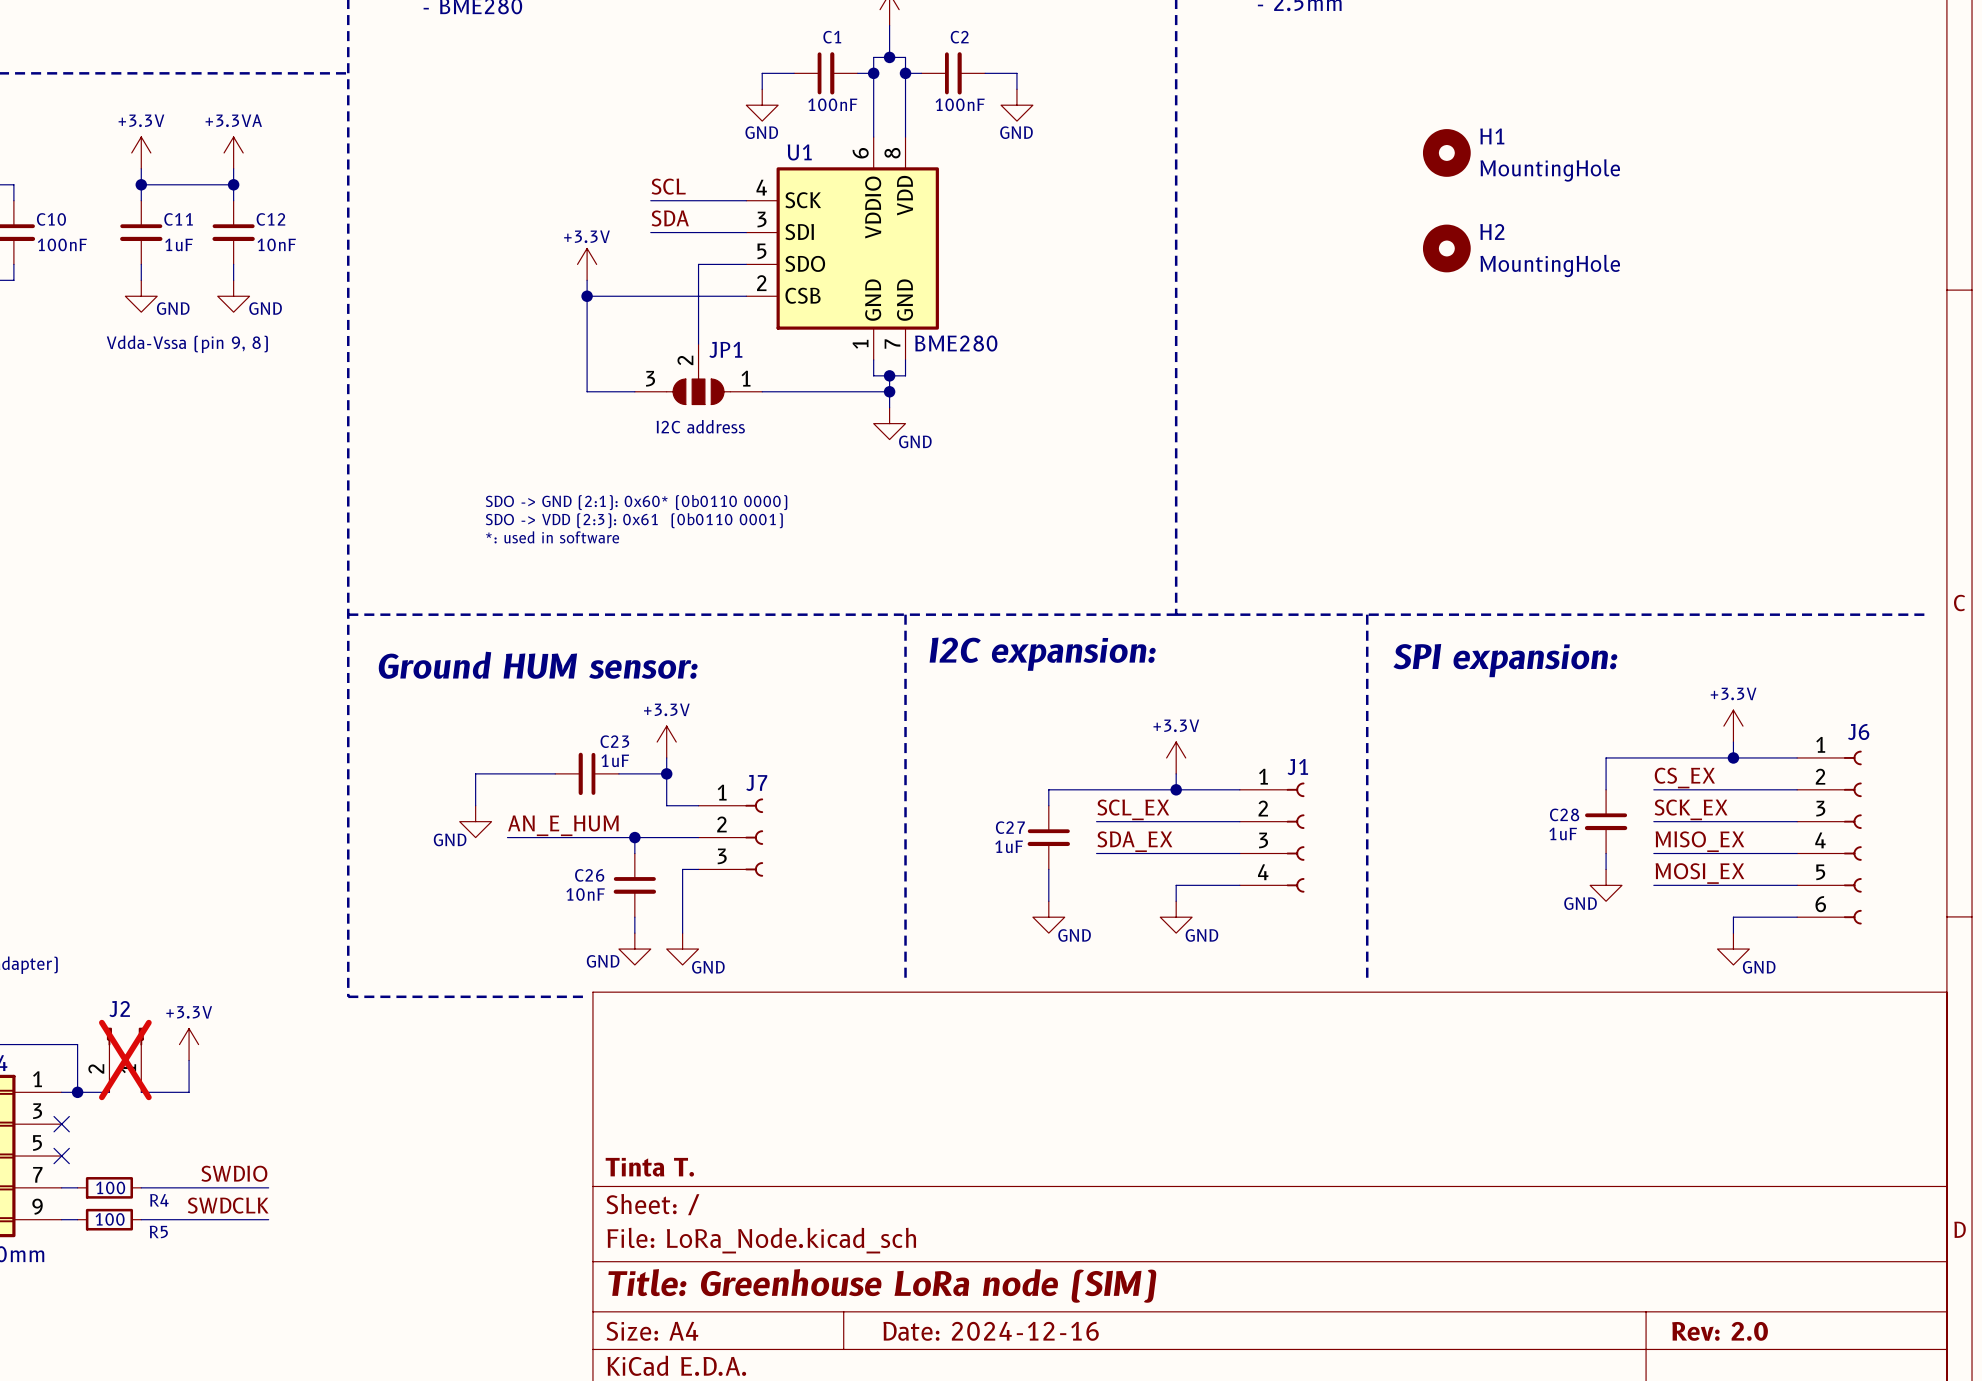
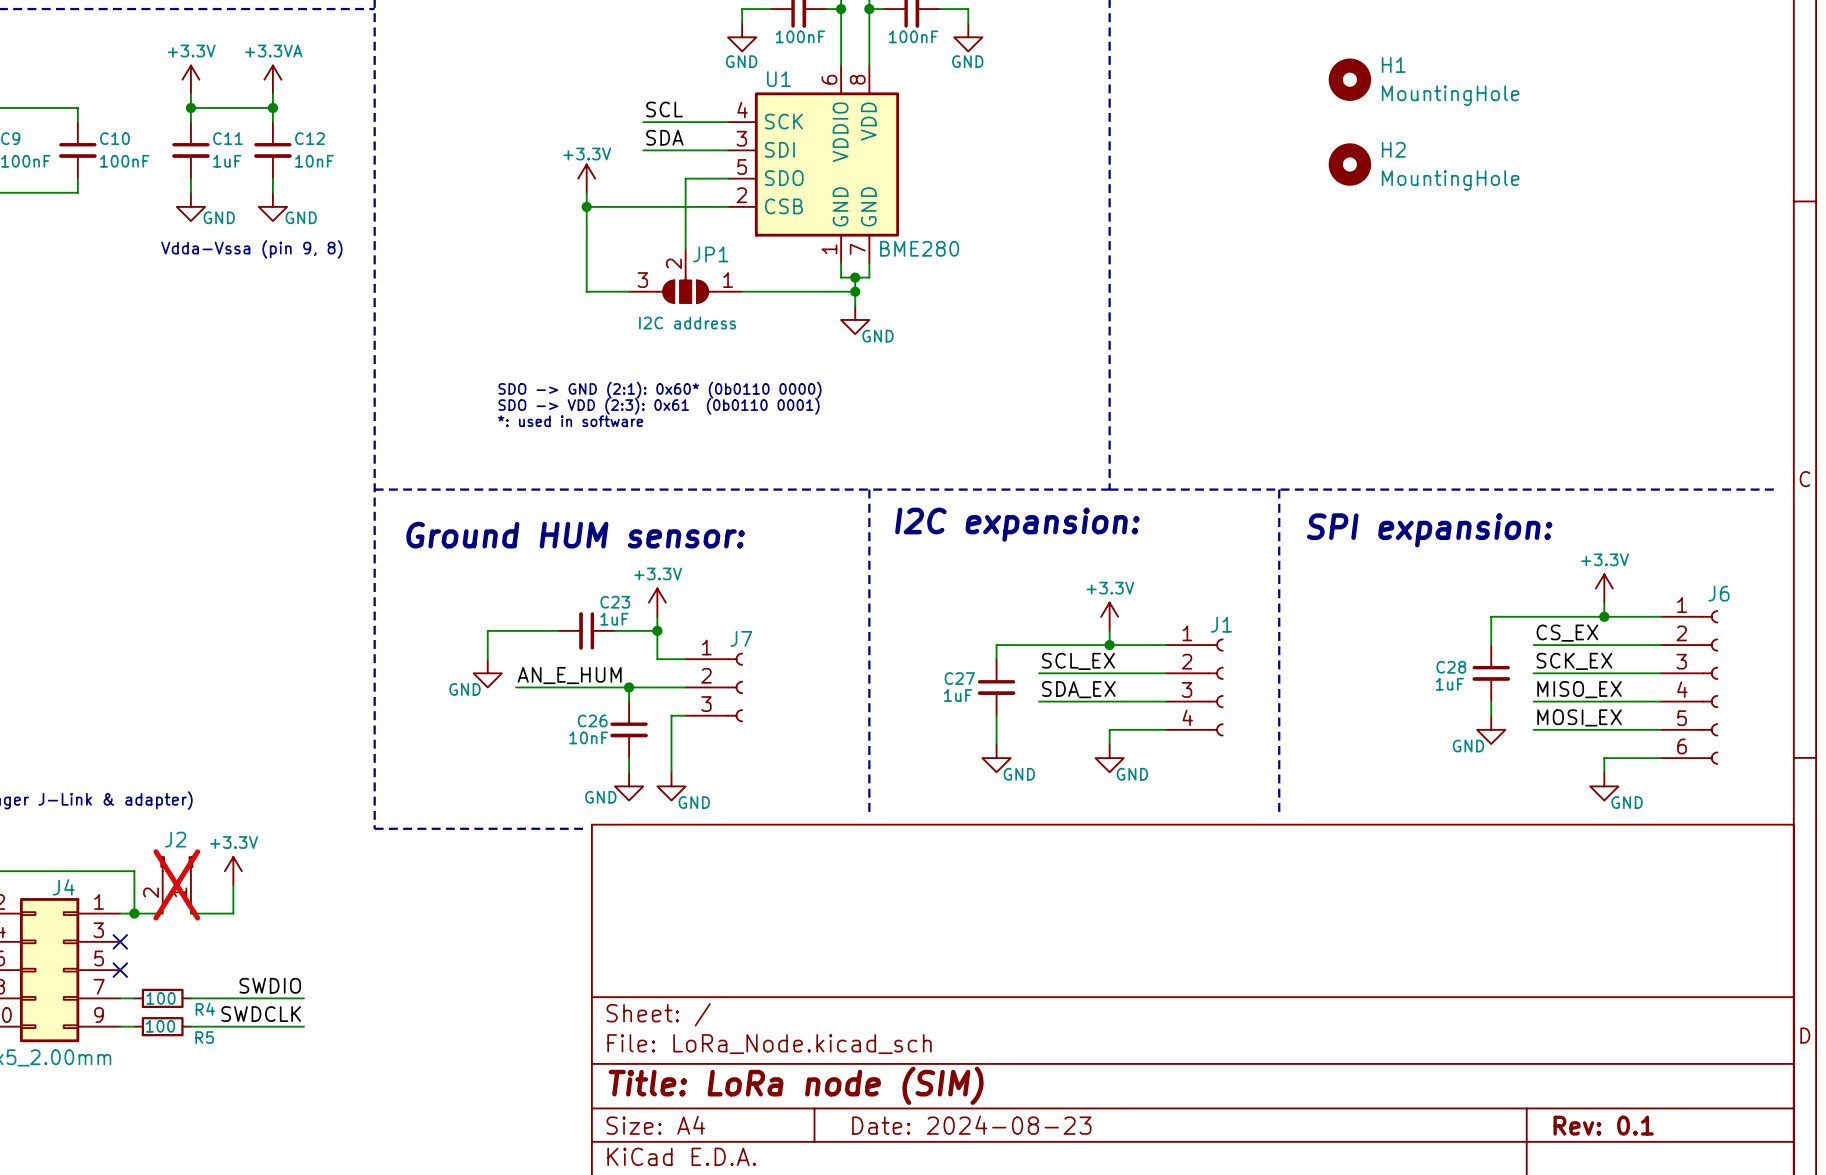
title block: Tinta T. (649, 1167) -> none
title block: Title: Greenhouse LoRa node (SIM) (882, 1285) -> Title: LoRa node (SIM) (796, 1085)
title block: Date: 2024-12-16 (991, 1331) -> Date: 2024-08-23 (971, 1125)
title block: Rev: 2.0 (1720, 1331) -> Rev: 0.1 (1603, 1125)

